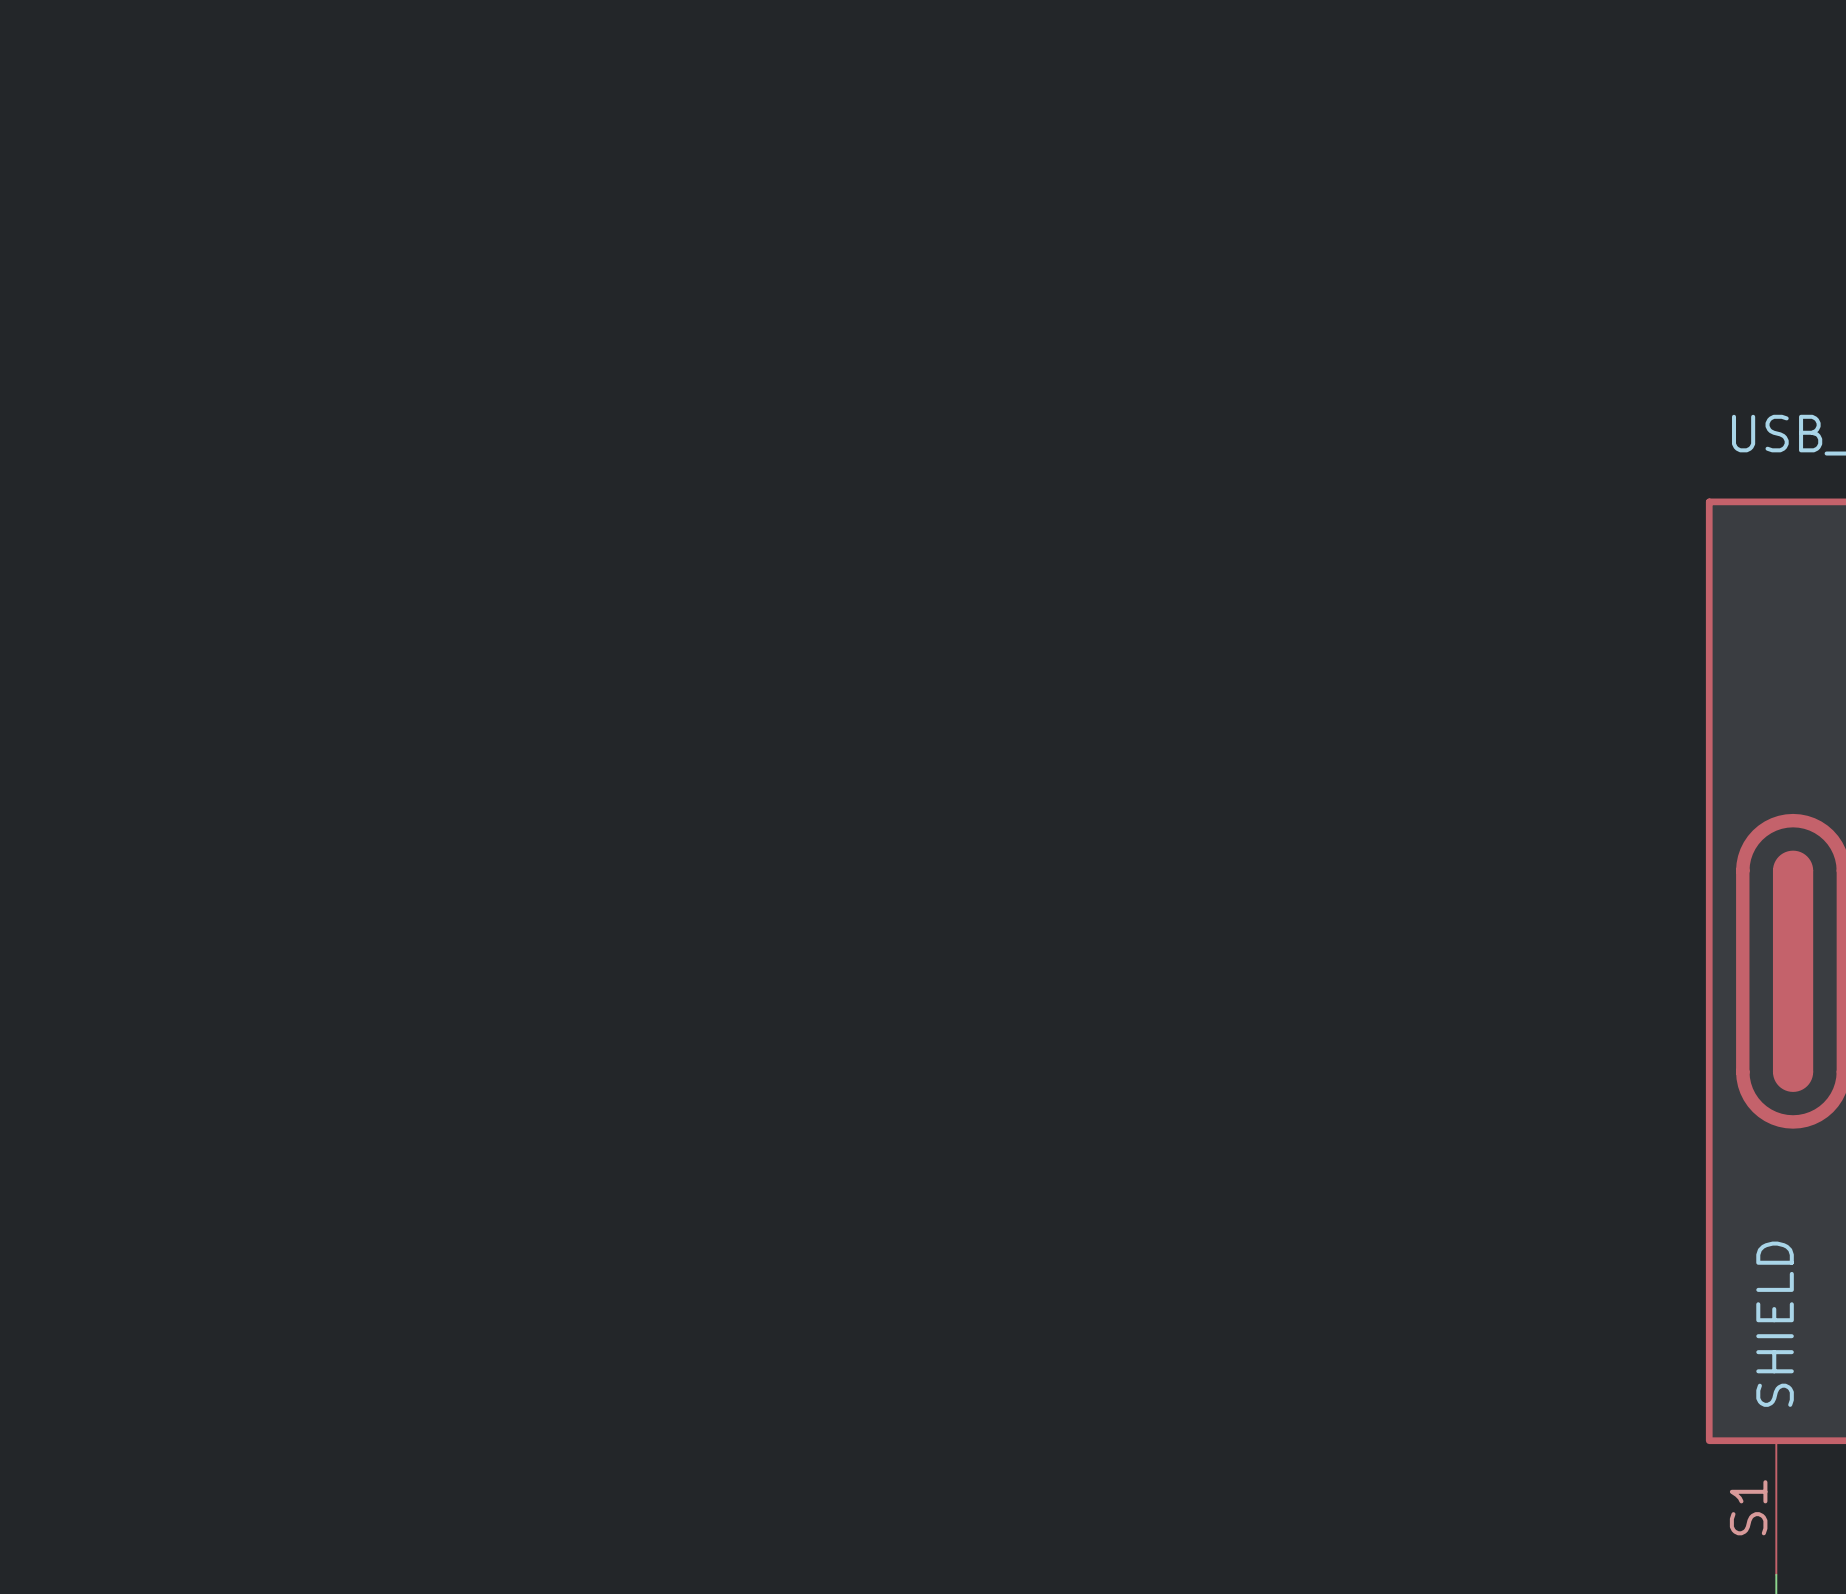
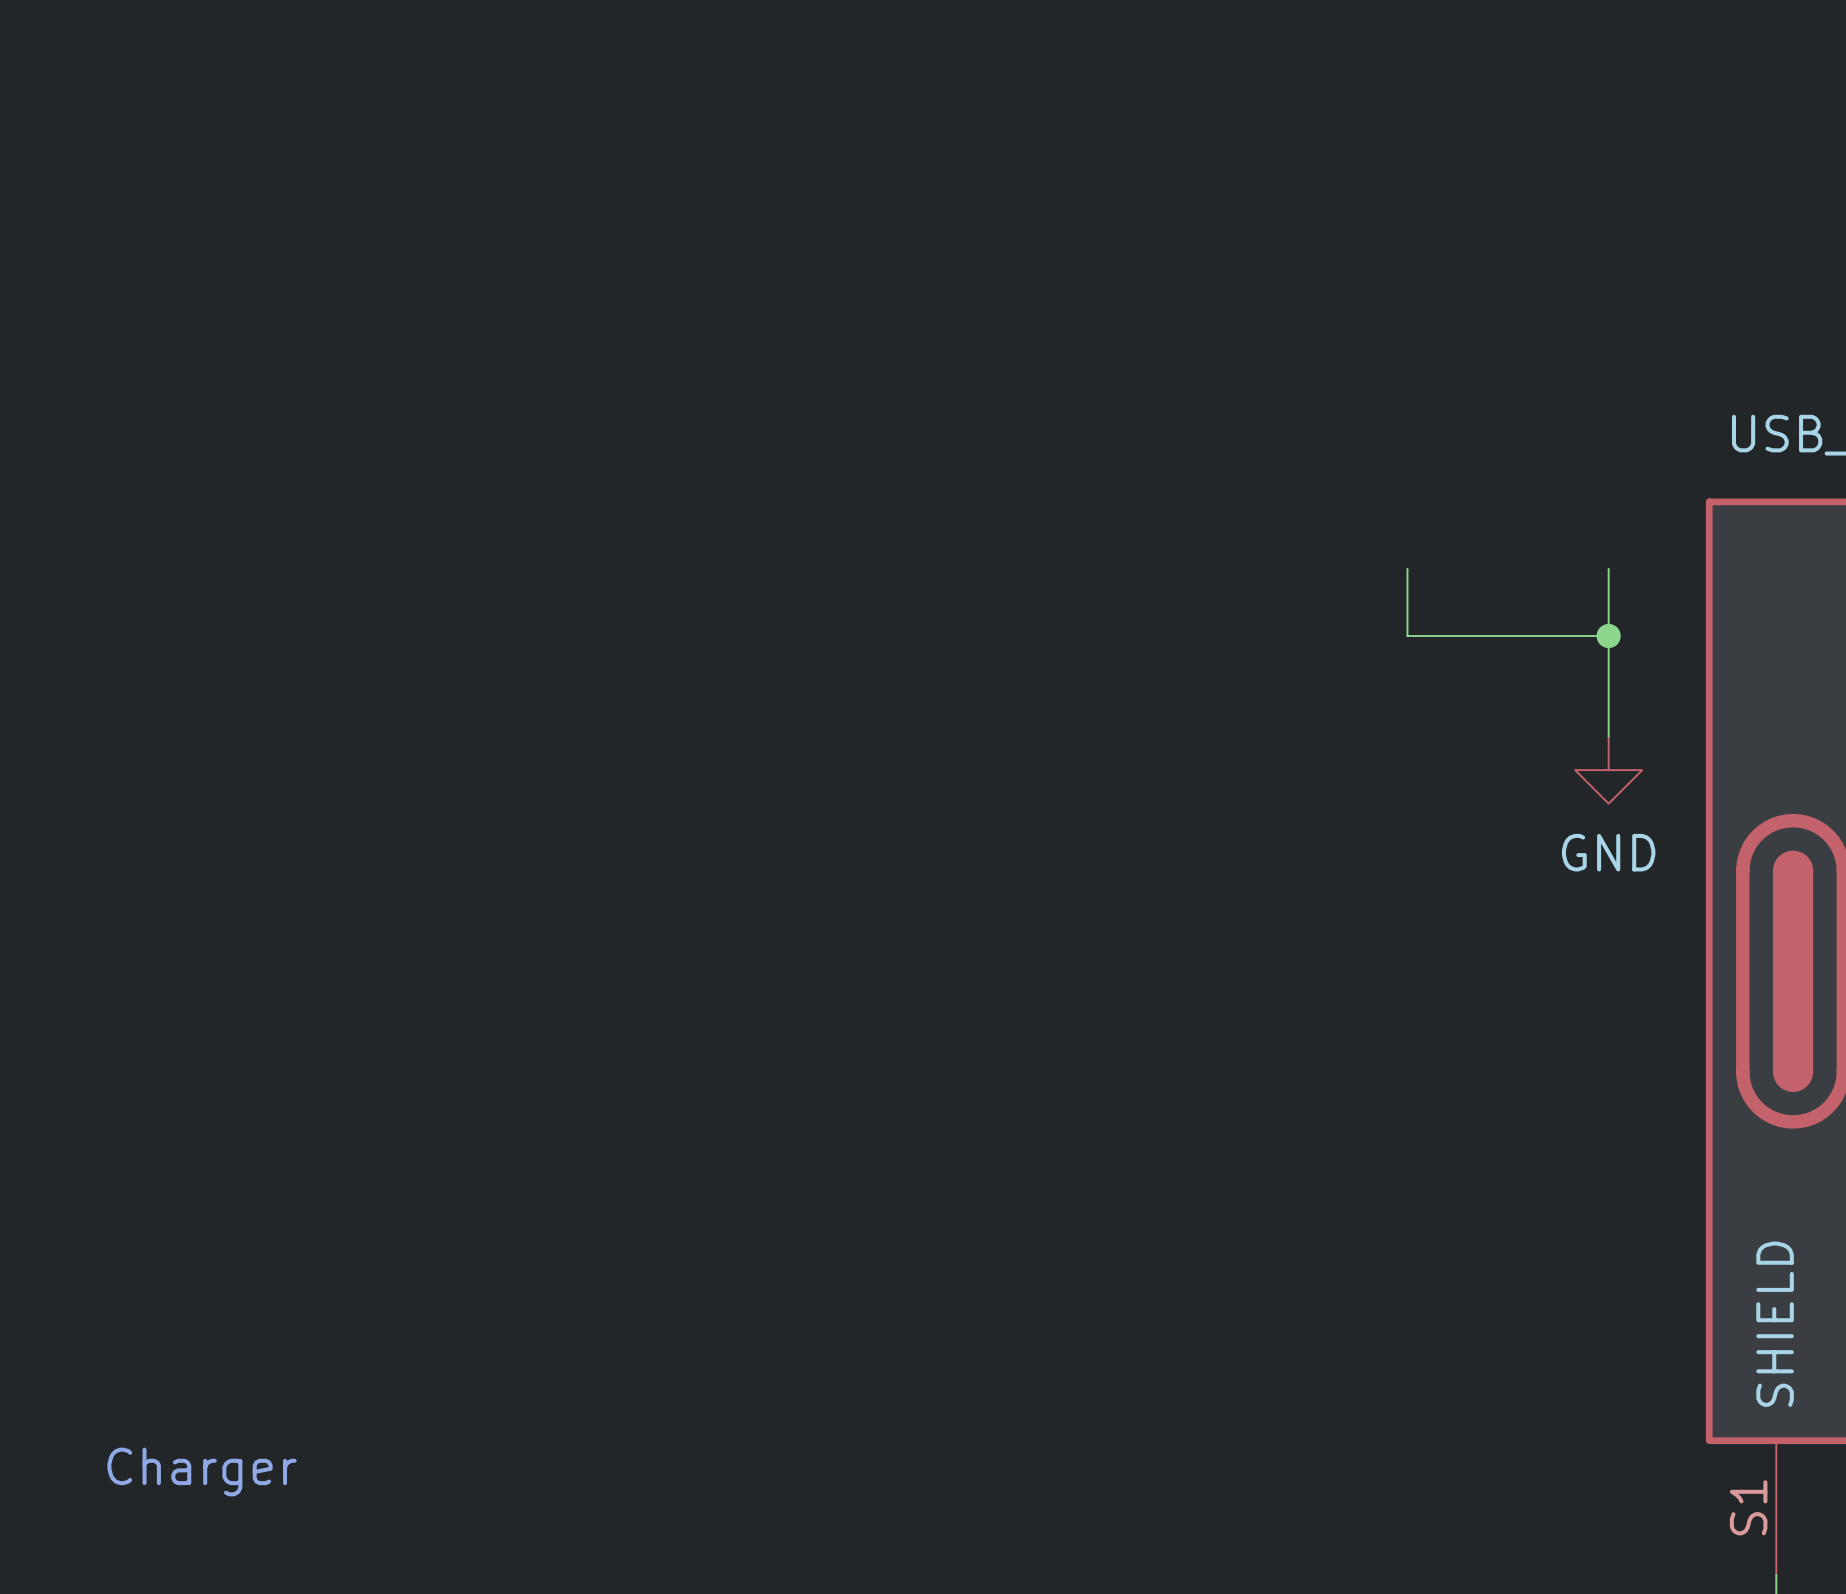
wire: none -> (1407, 568) (1407, 635) (1608, 635)
wire: none -> (1608, 568) (1608, 736)
junction: none -> (1608, 635)
power symbol: none -> GND (1608, 770)
text: none -> Charger (202, 1471)

